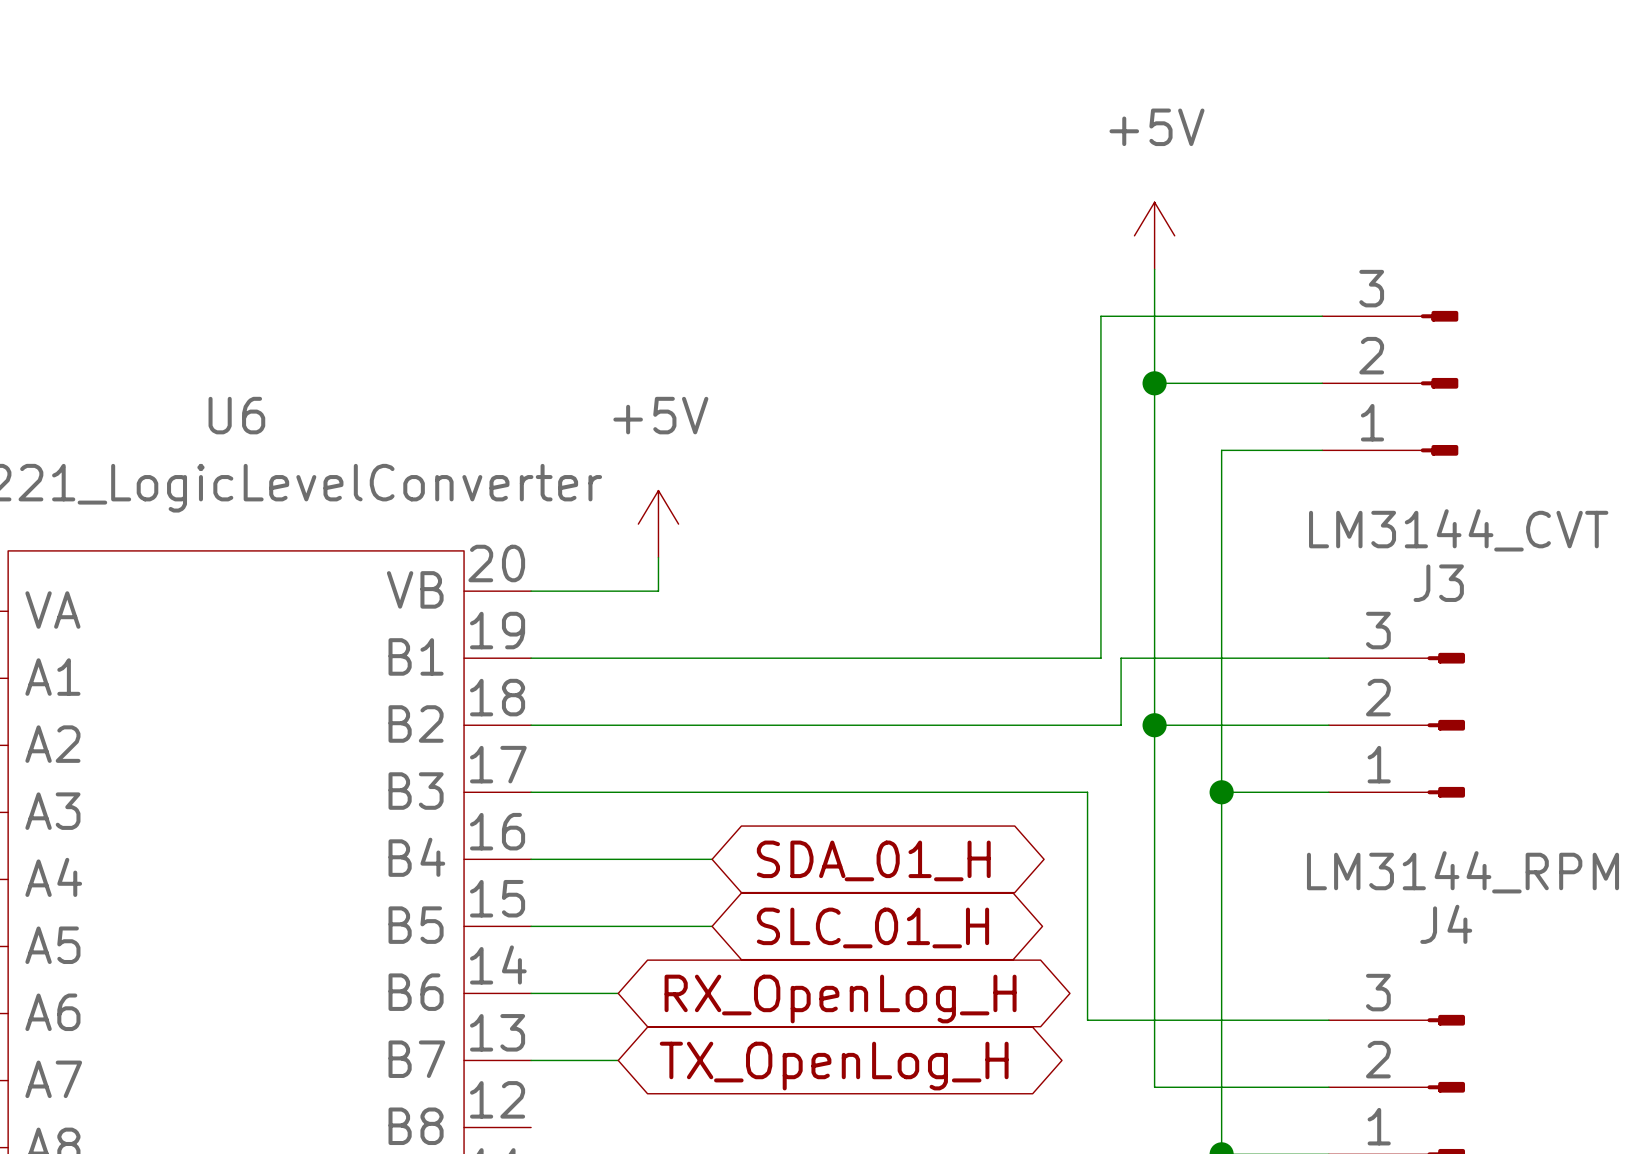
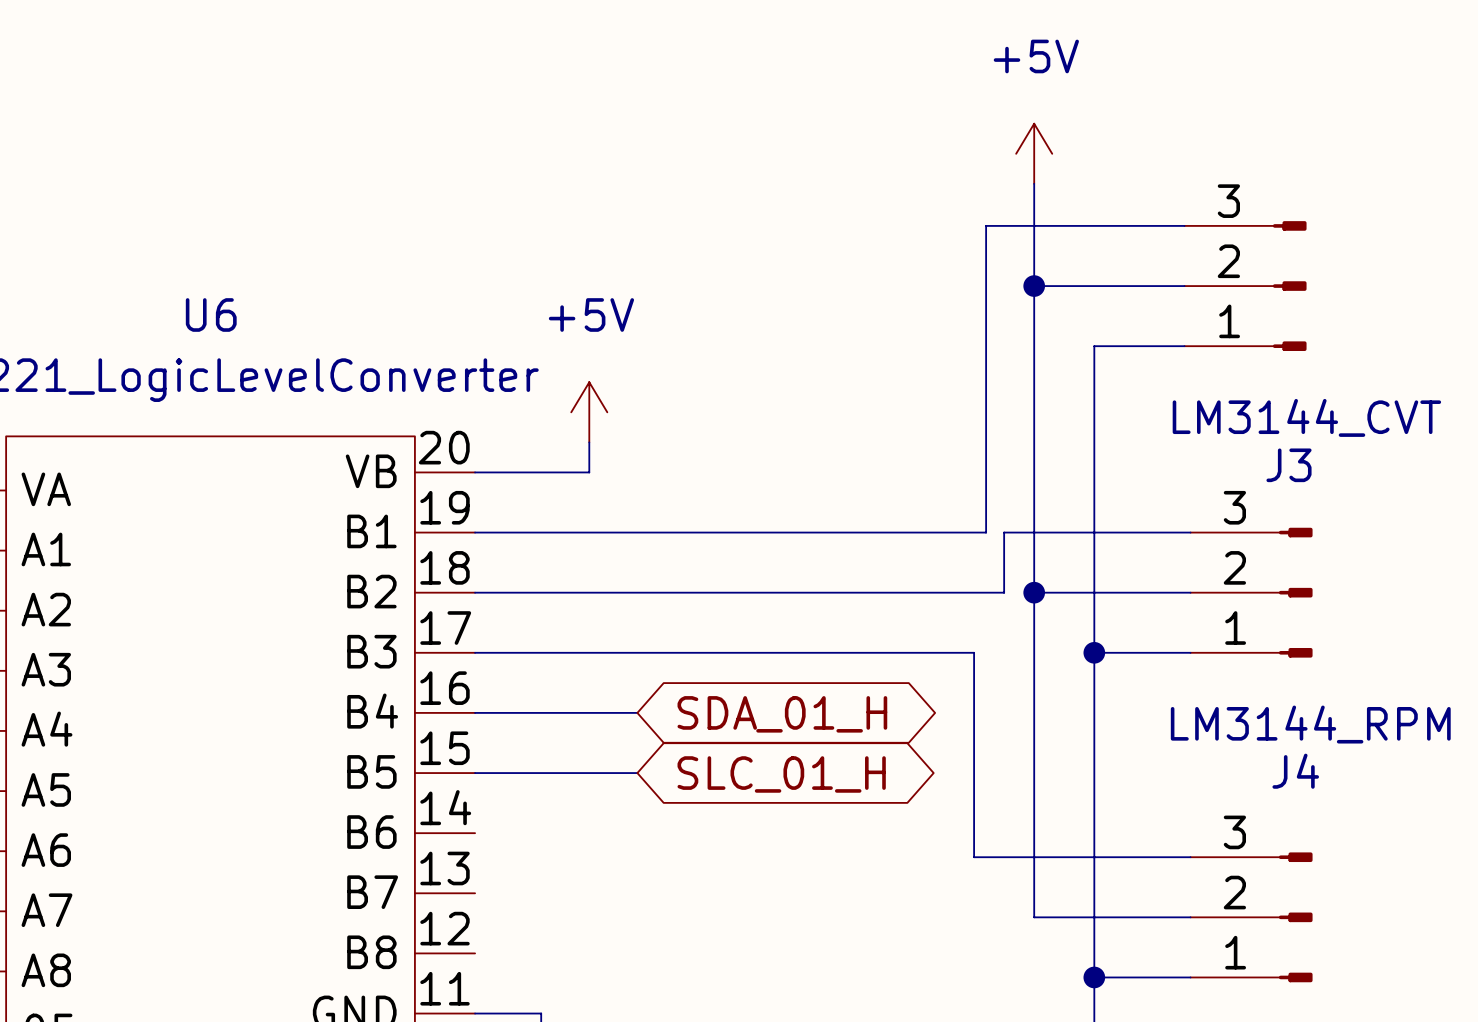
wire: (531, 993) (618, 993) -> none
global label: RX_OpenLog_H (840, 999) -> none
wire: (531, 1060) (618, 1060) -> none
global label: TX_OpenLog_H (834, 1066) -> none

